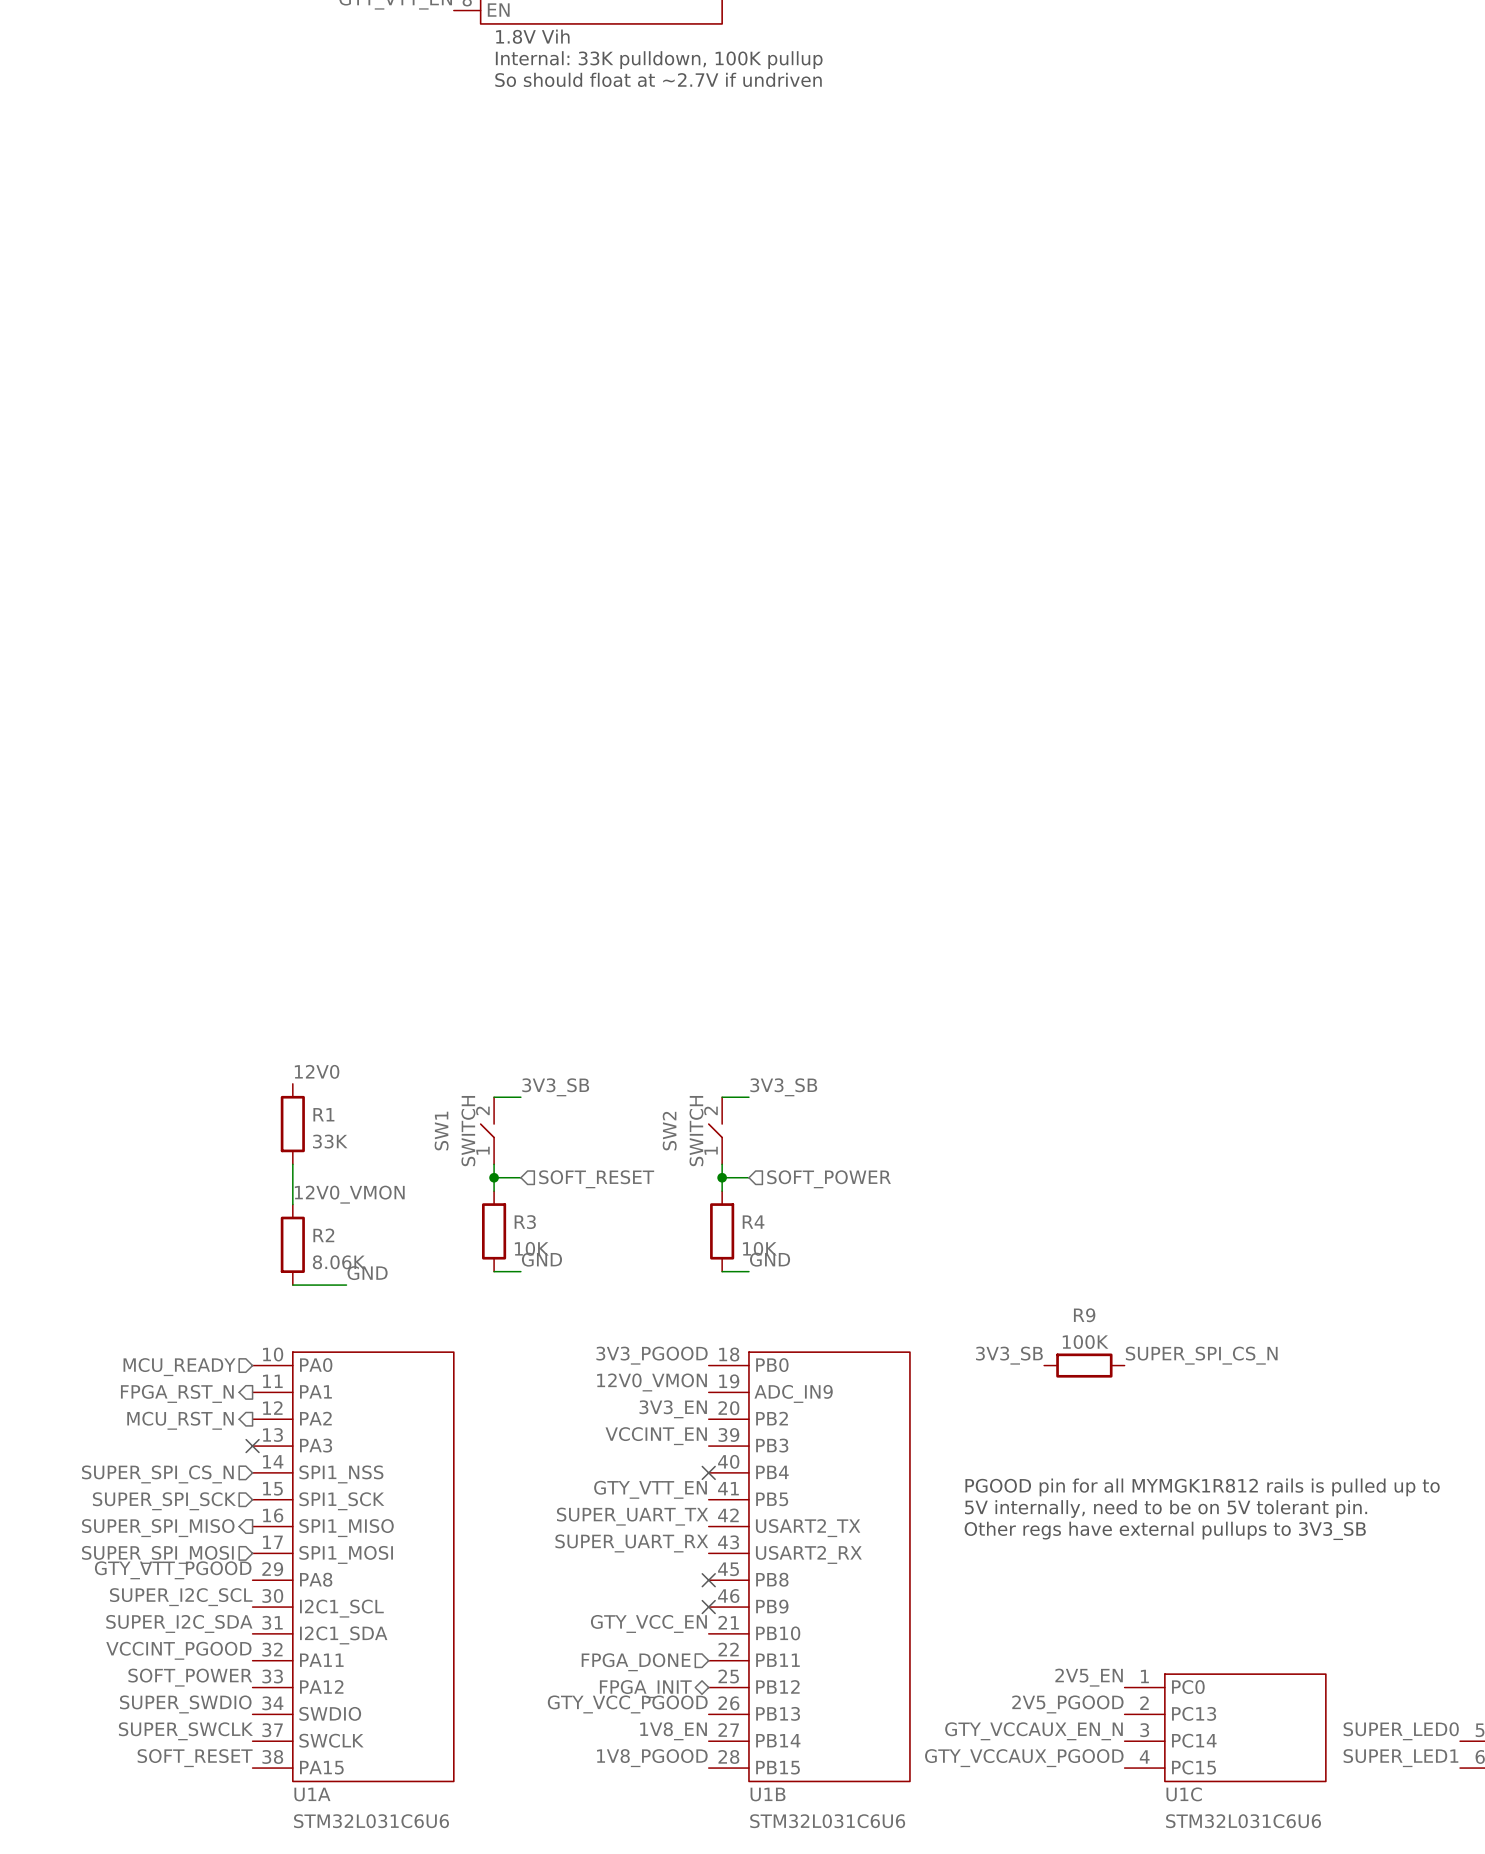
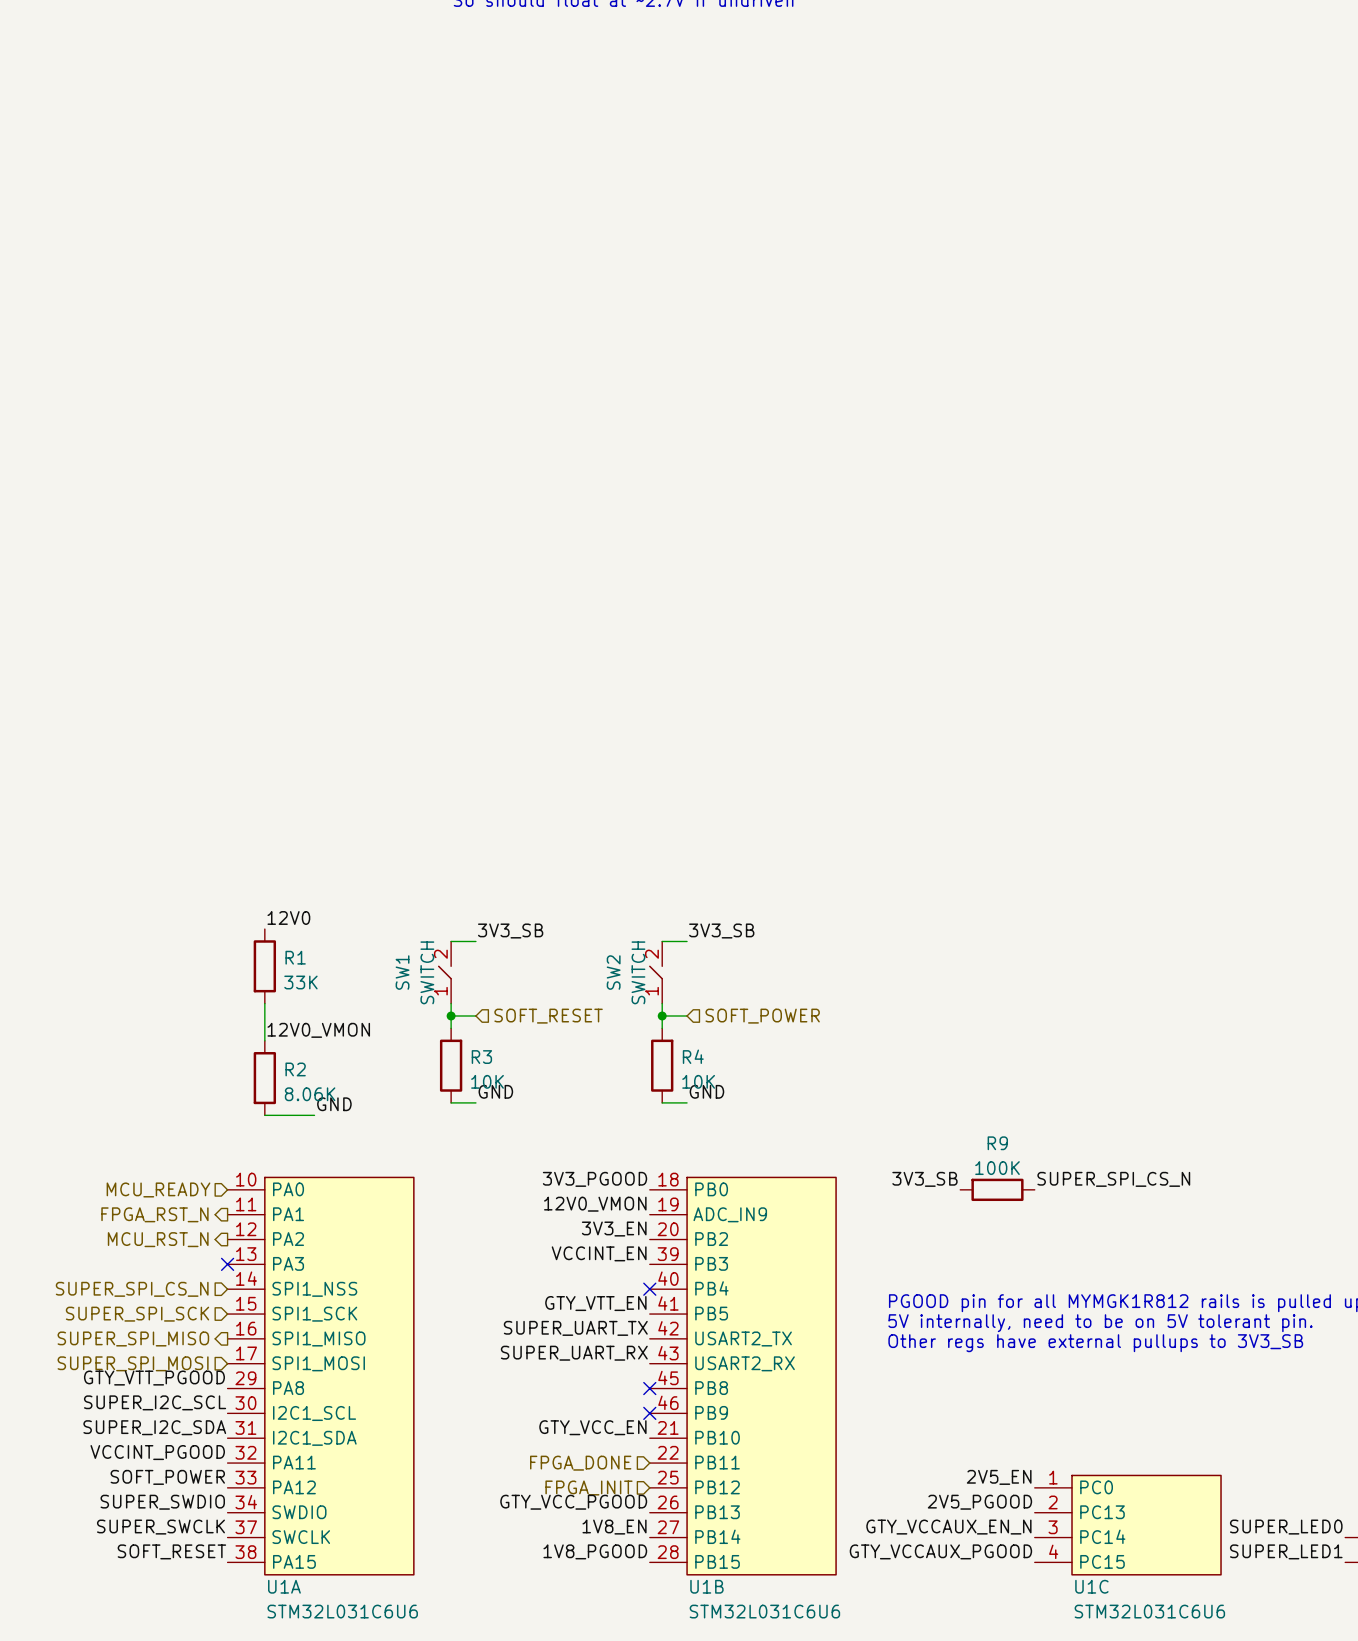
hierarchical label shape: bidirectional (645, 1689) -> input (588, 1488)

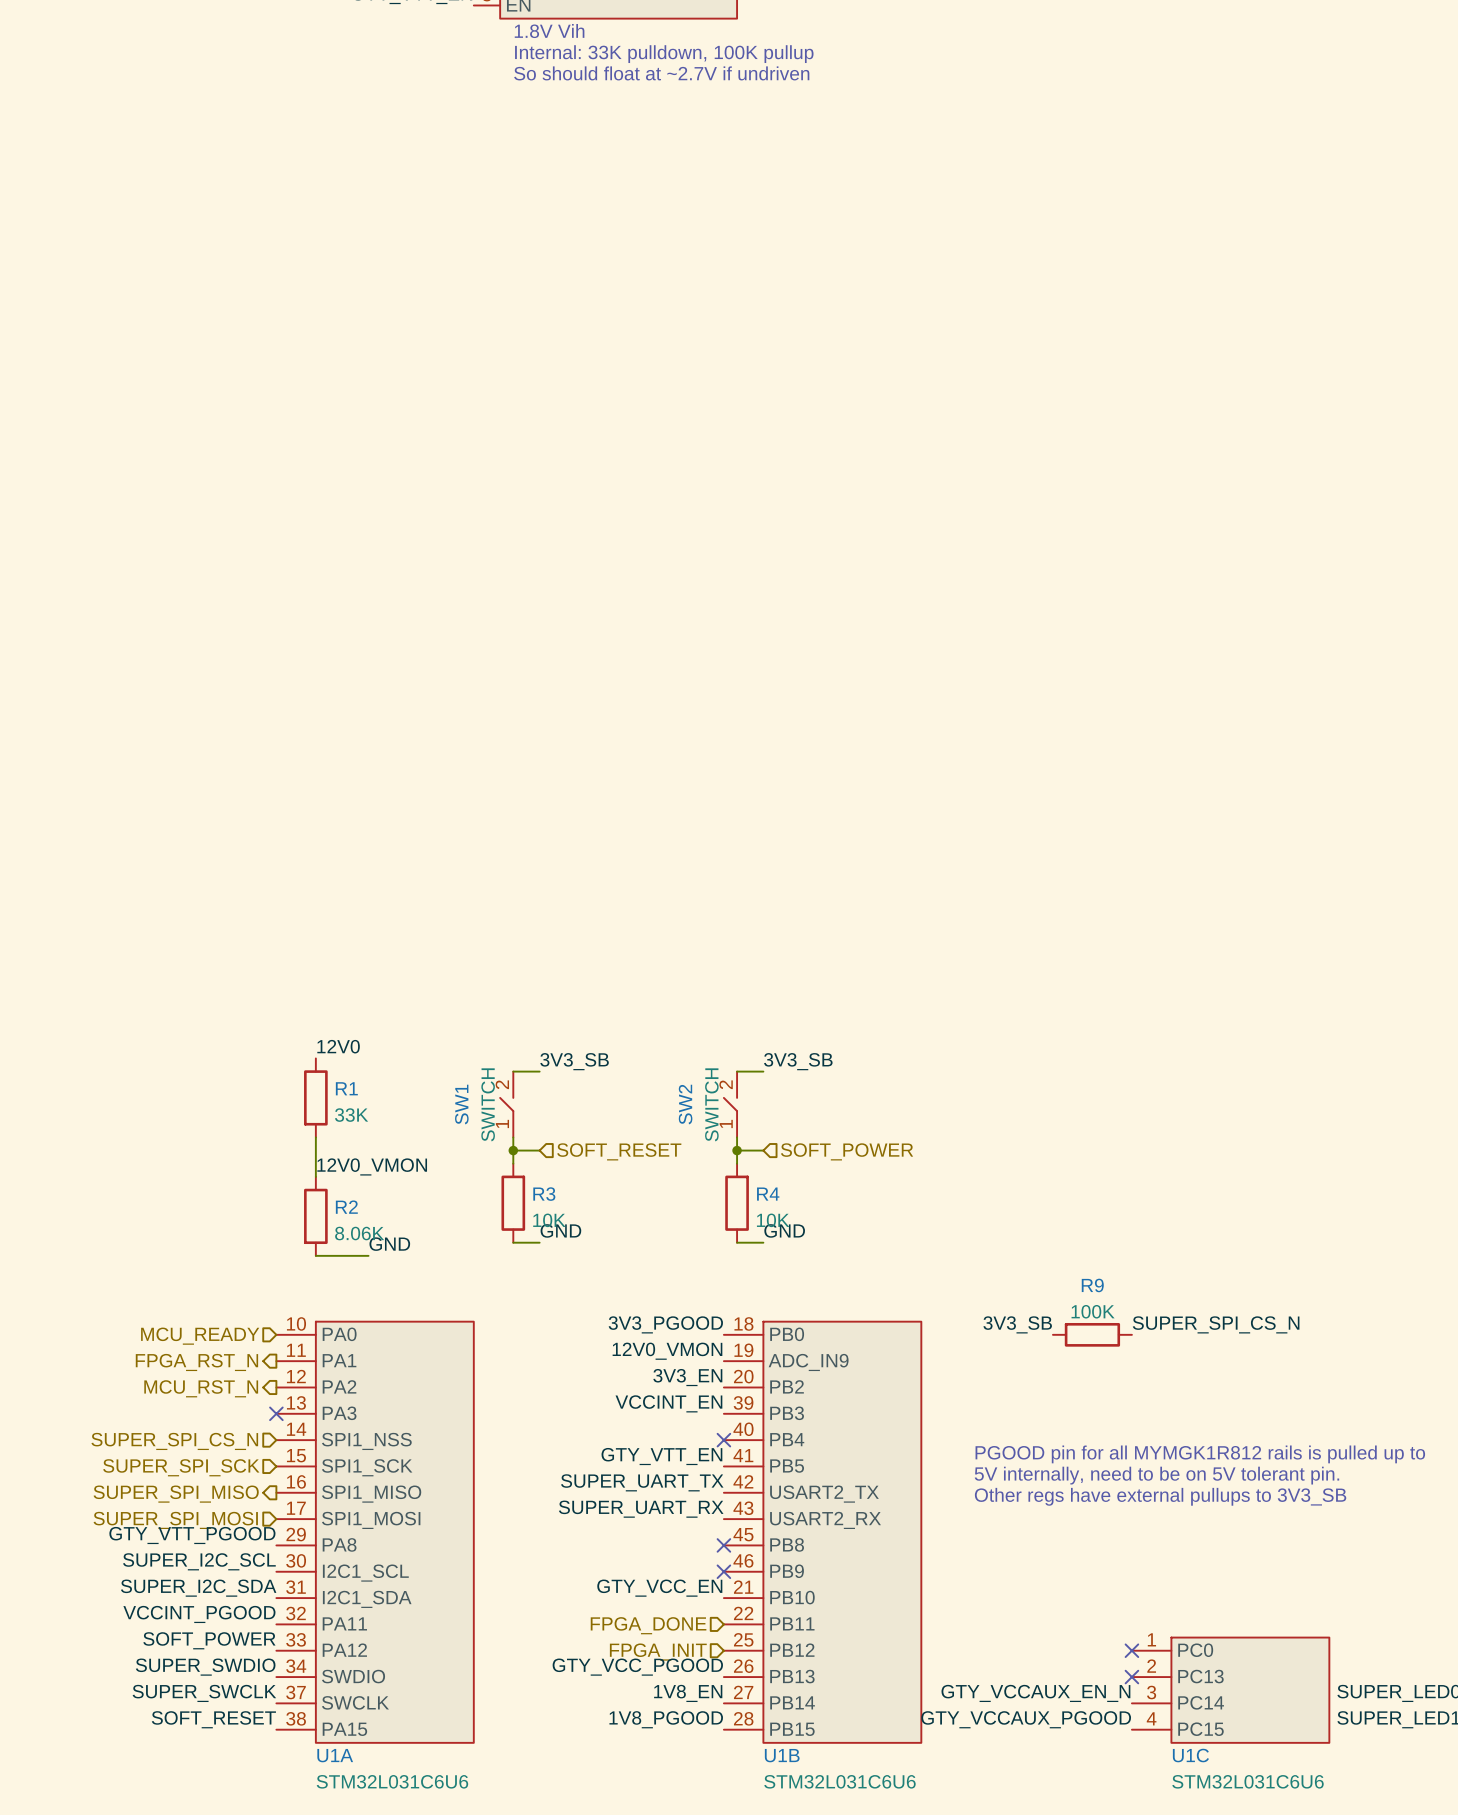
label: 2V5_EN (999, 1477) -> none
no-connect mark: none -> (1131, 1650)
label: 2V5_PGOOD (979, 1502) -> none
no-connect mark: none -> (1131, 1677)

